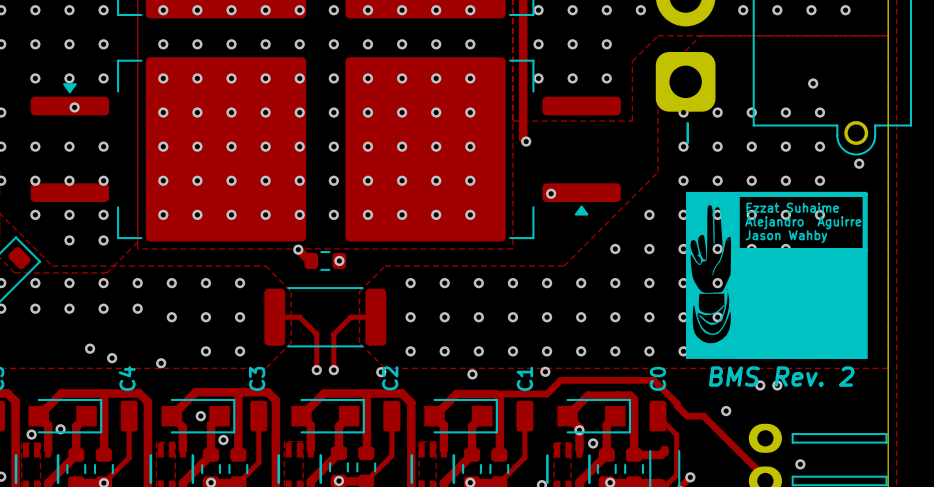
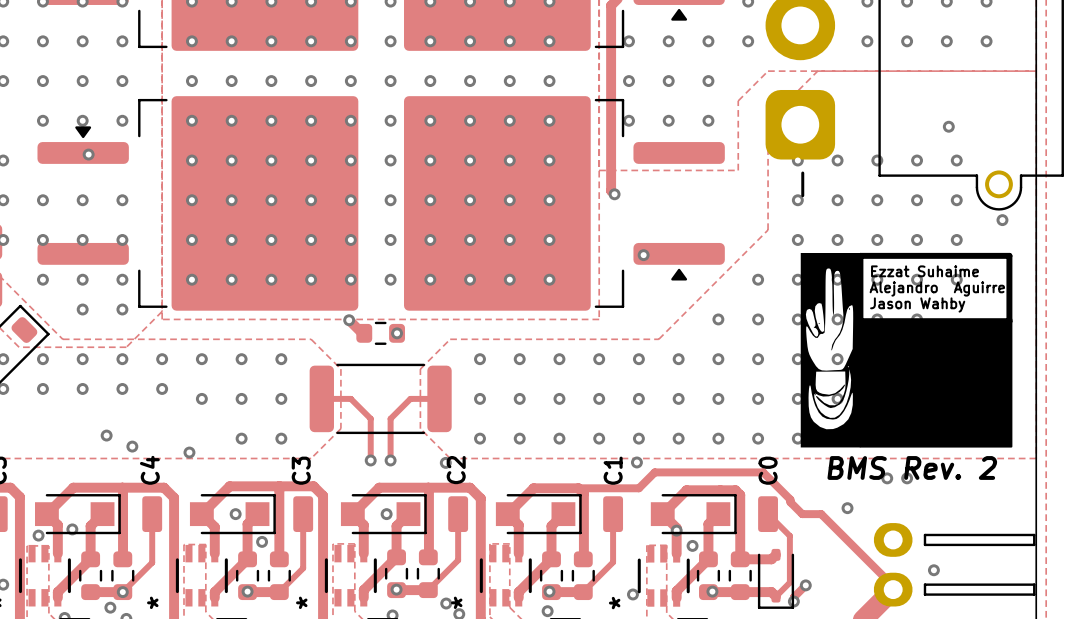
via: (472, 374) -> none
via: none -> (386, 514)

